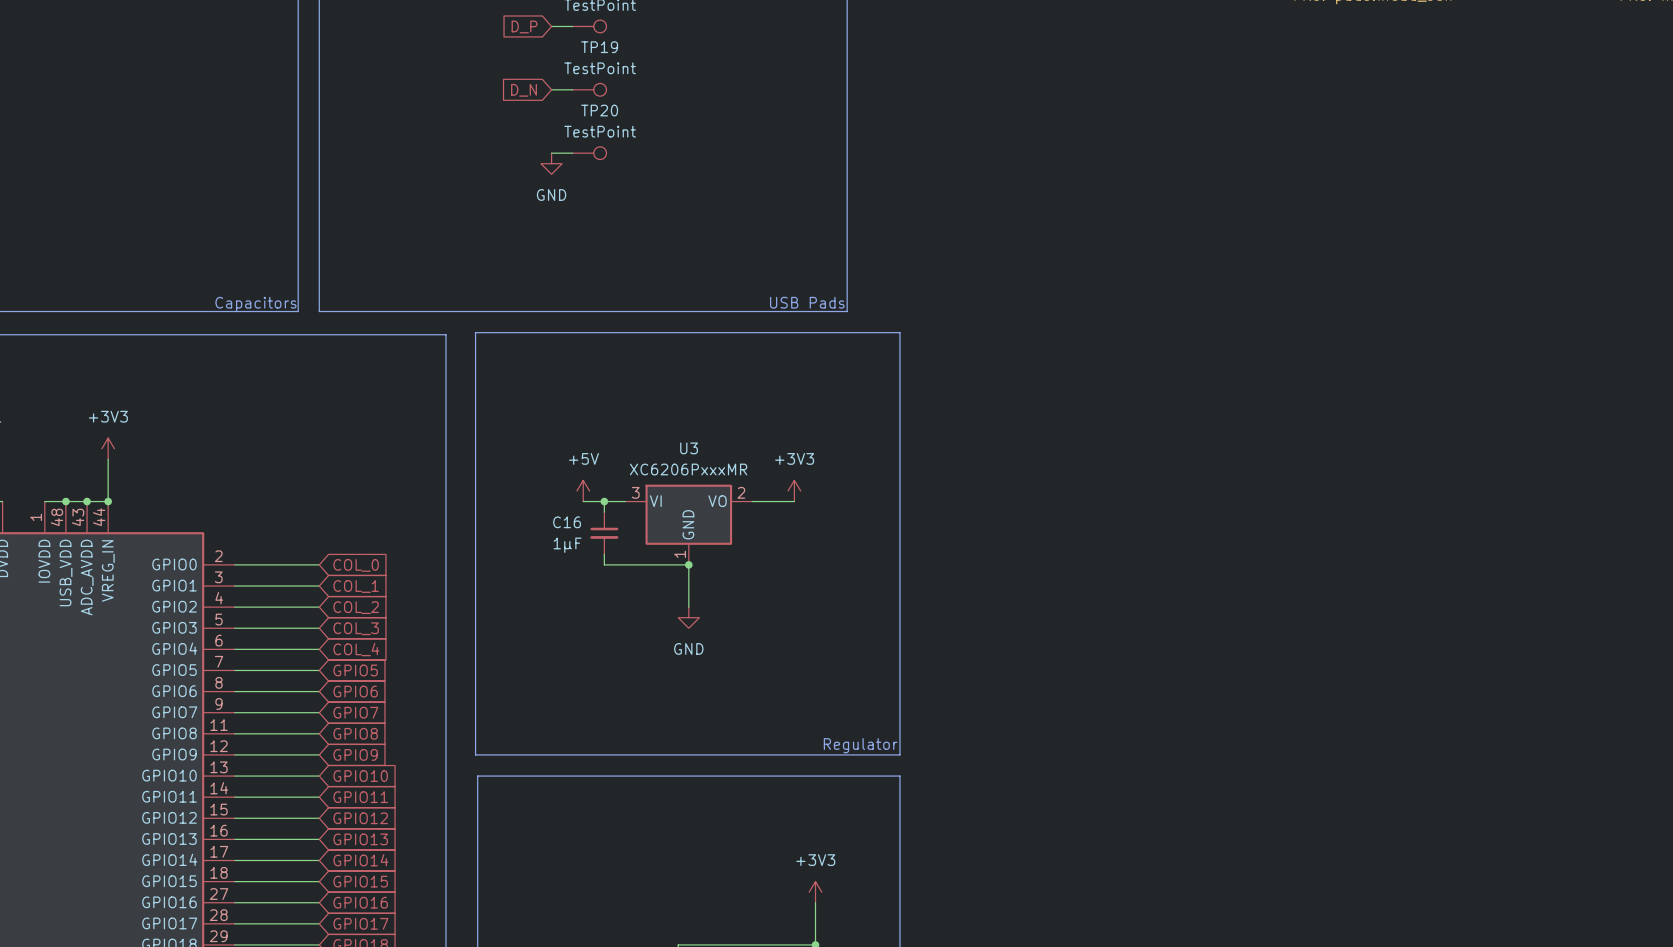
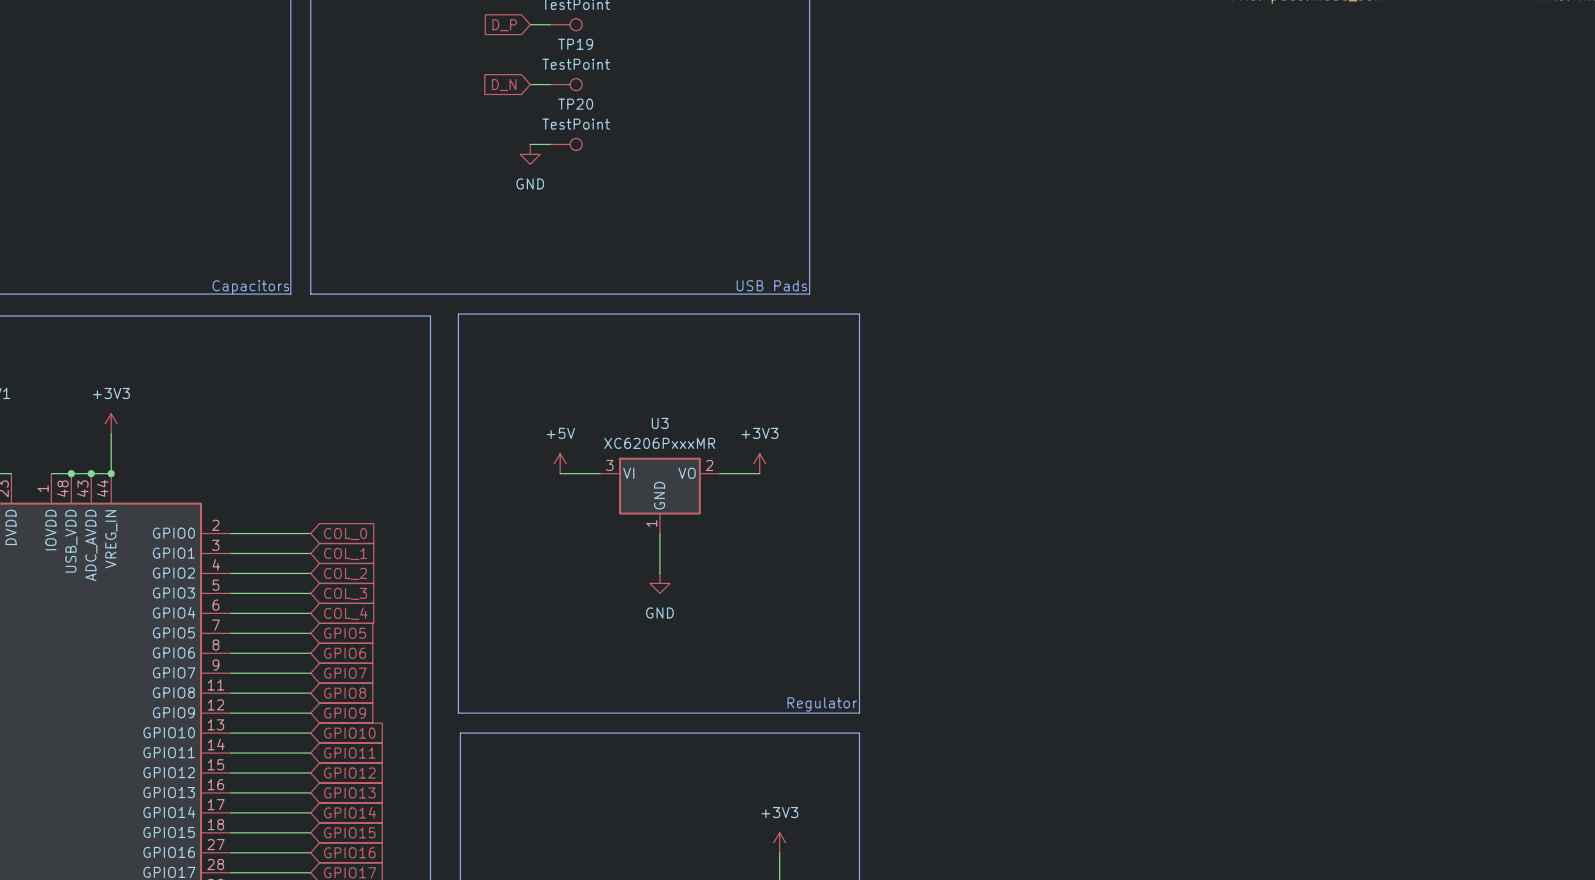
wire: (604, 501) (604, 512) -> none
junction: (604, 501) -> none
C16: 1µF (604, 533) -> none
wire: (604, 554) (604, 564) (688, 564) -> none
junction: (688, 564) -> none

